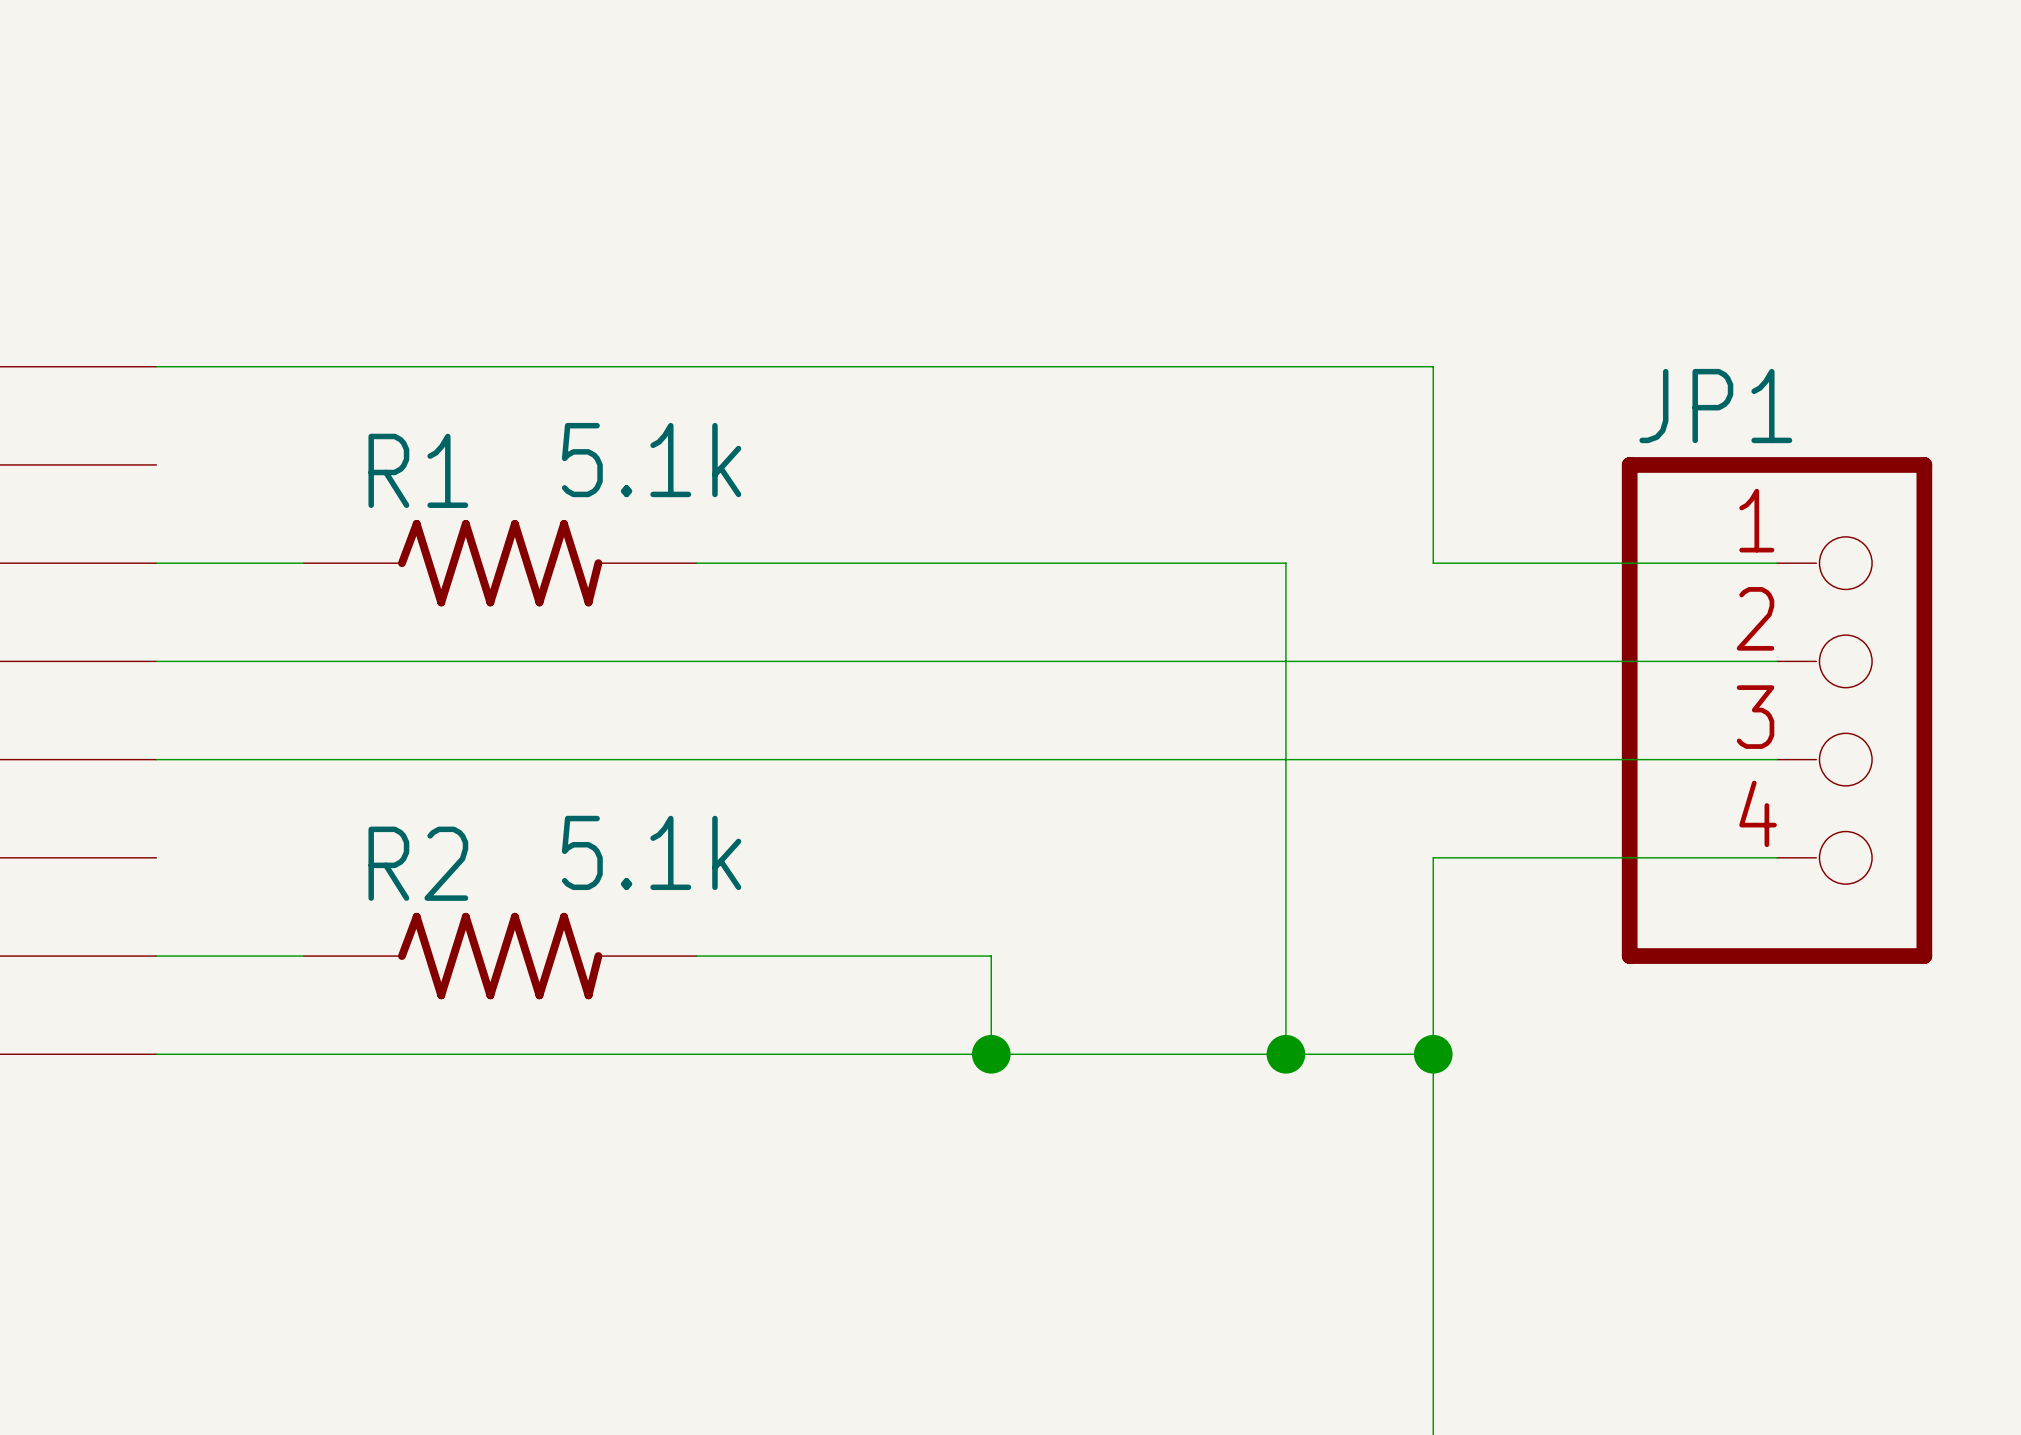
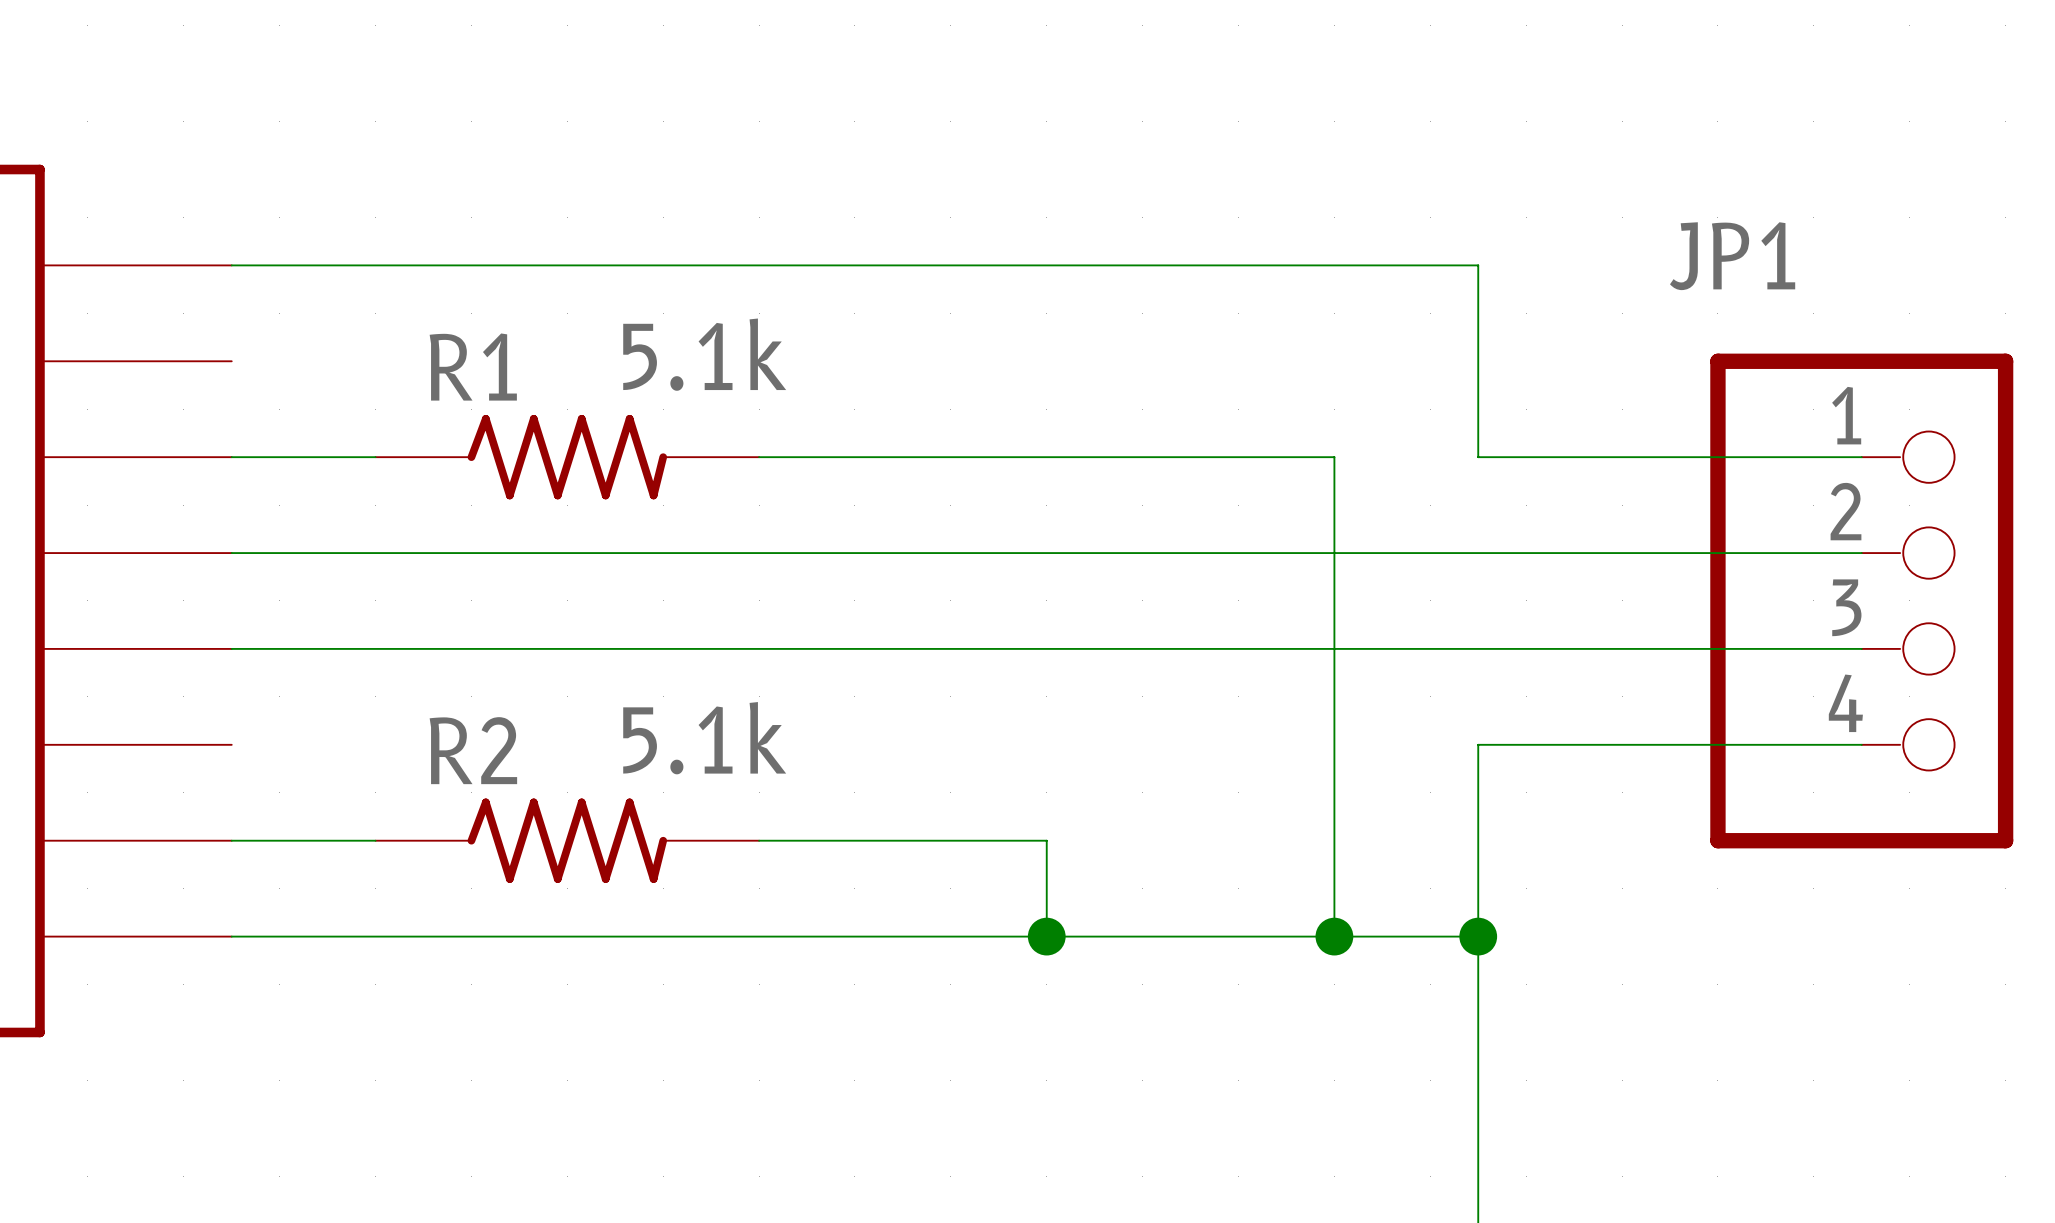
JP1 name position: JP1 (1715, 406) -> JP1 (1732, 256)
JP1 position: (1777, 710) -> (1861, 600)

